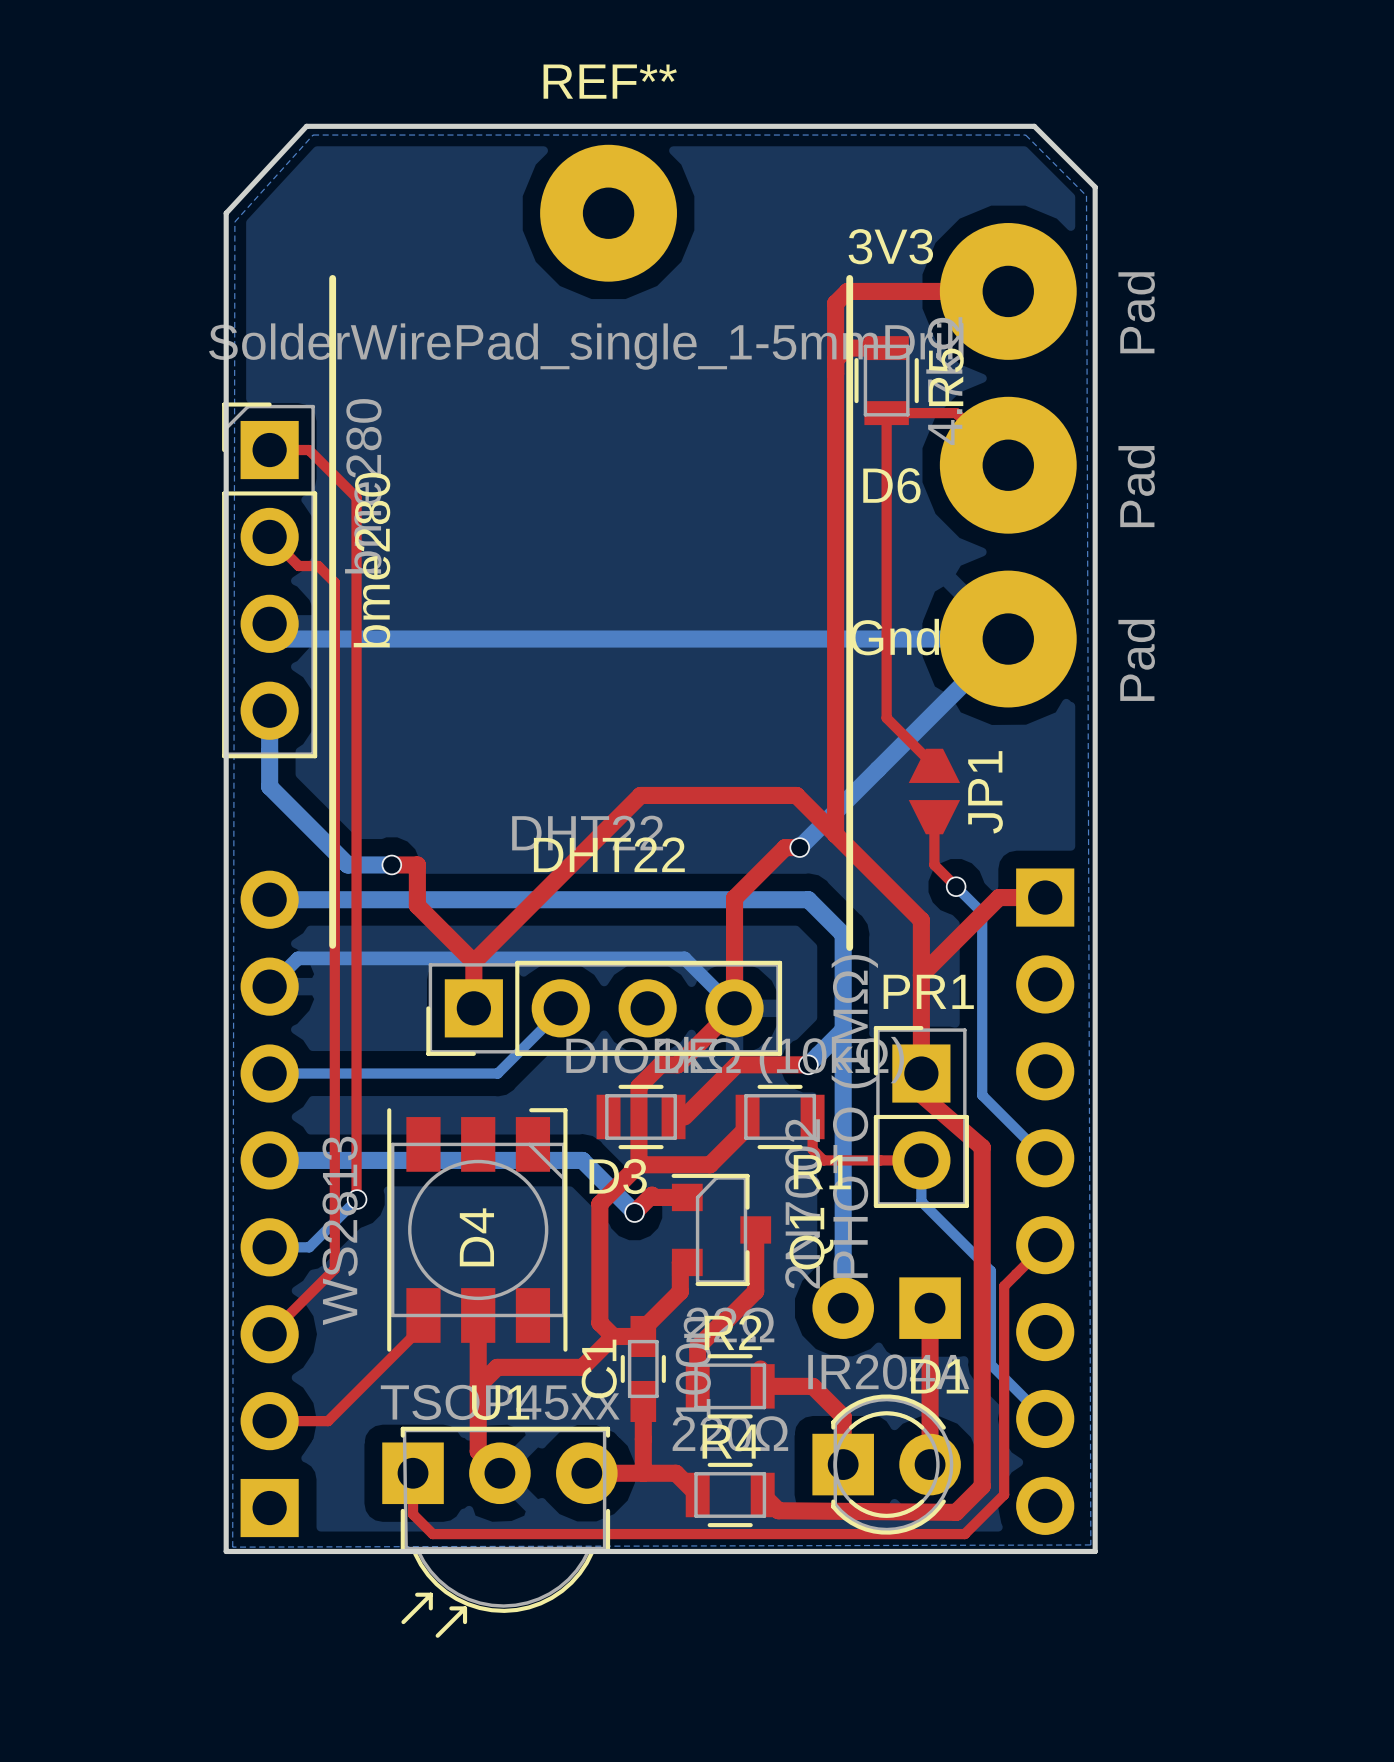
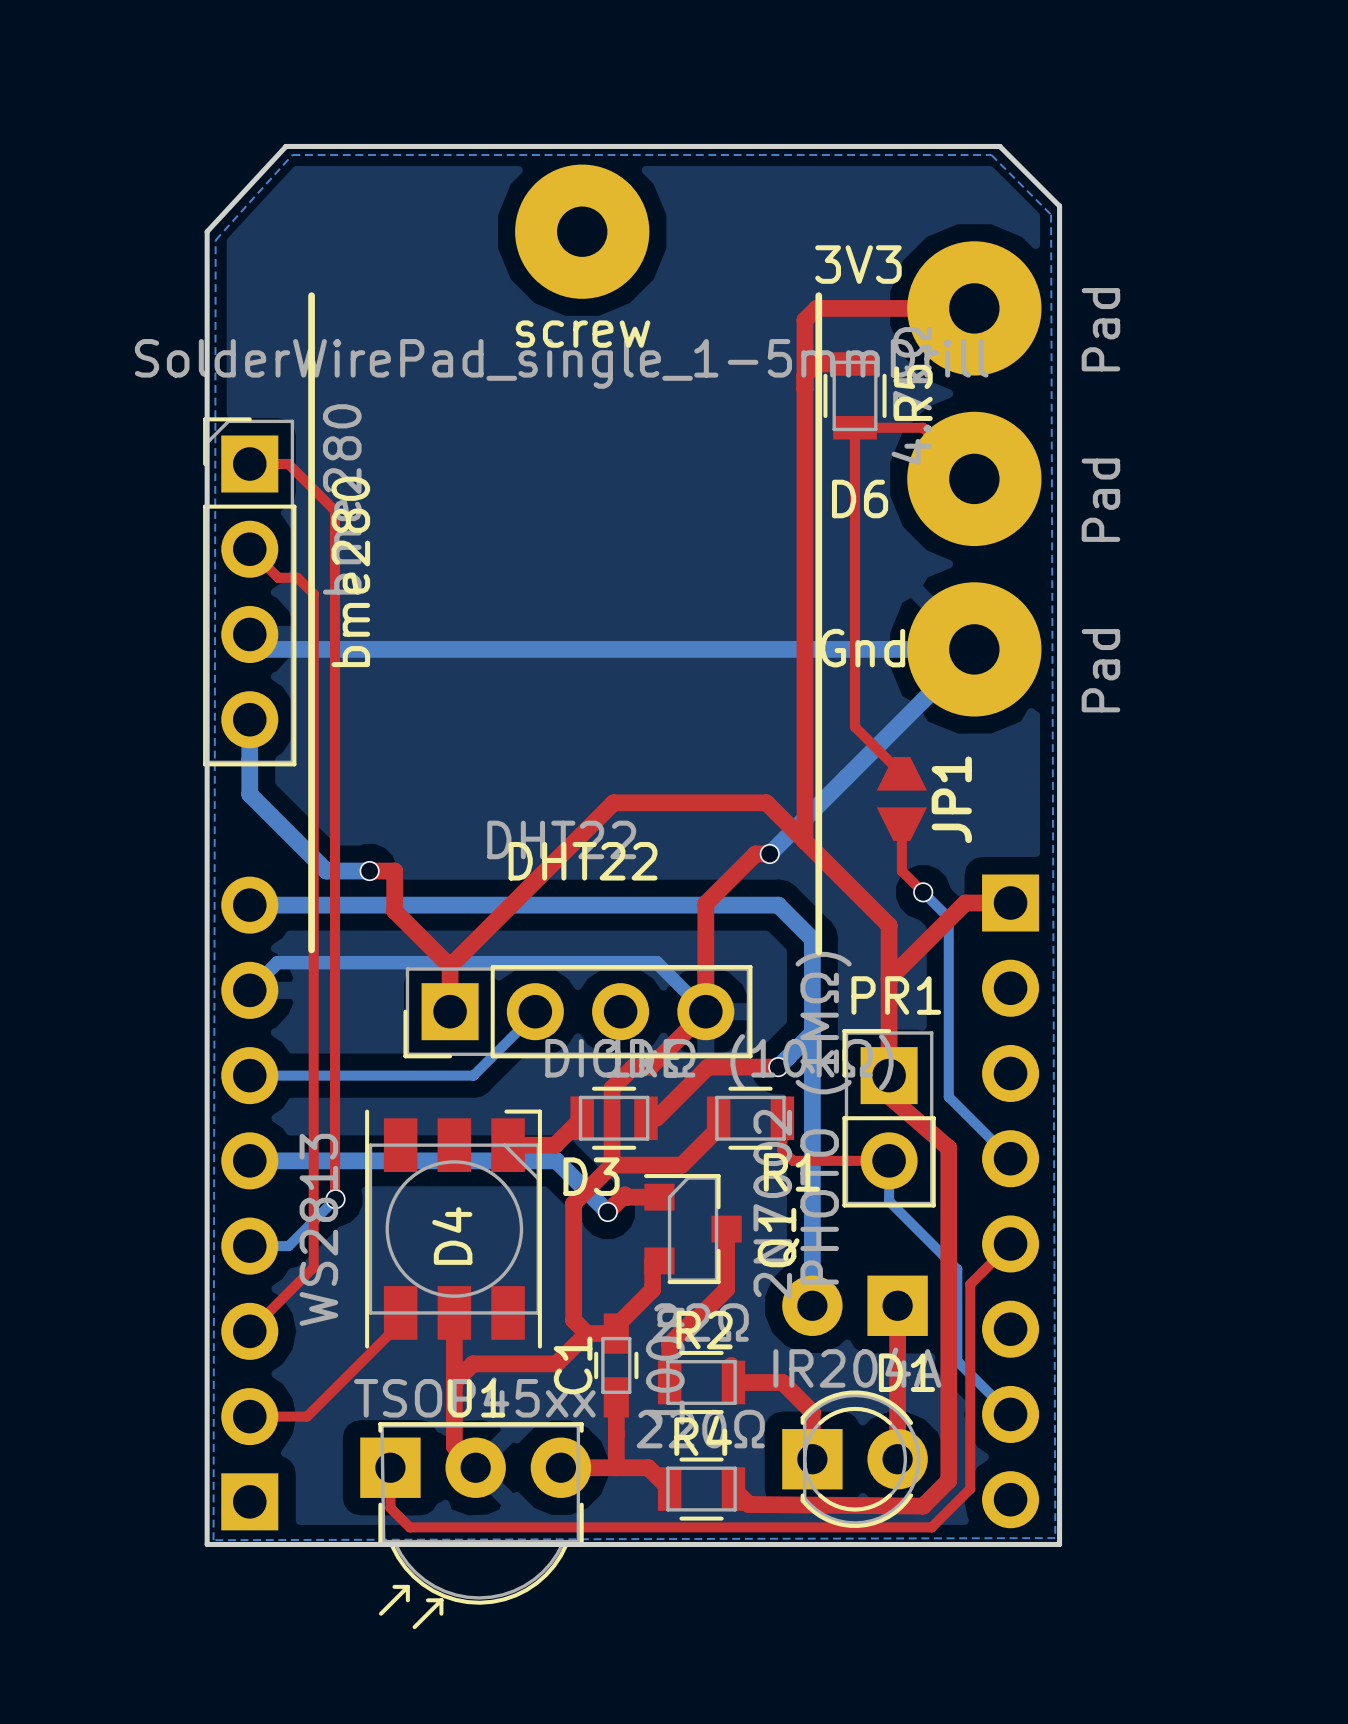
REF** name: REF** (610, 81) -> screw (583, 334)
top track: none -> (582, 1118) (555, 1145) (508, 1145)

